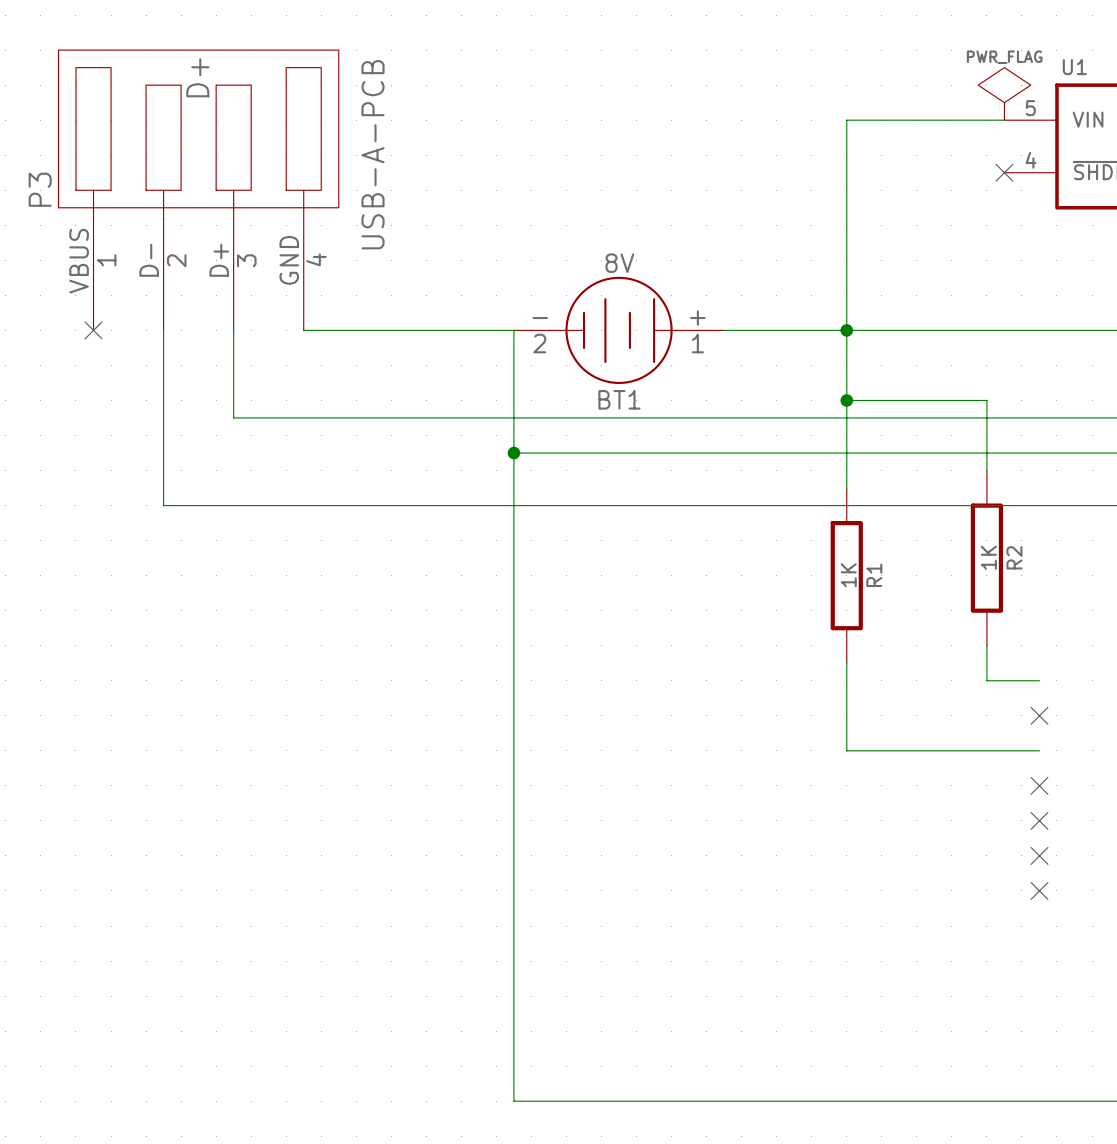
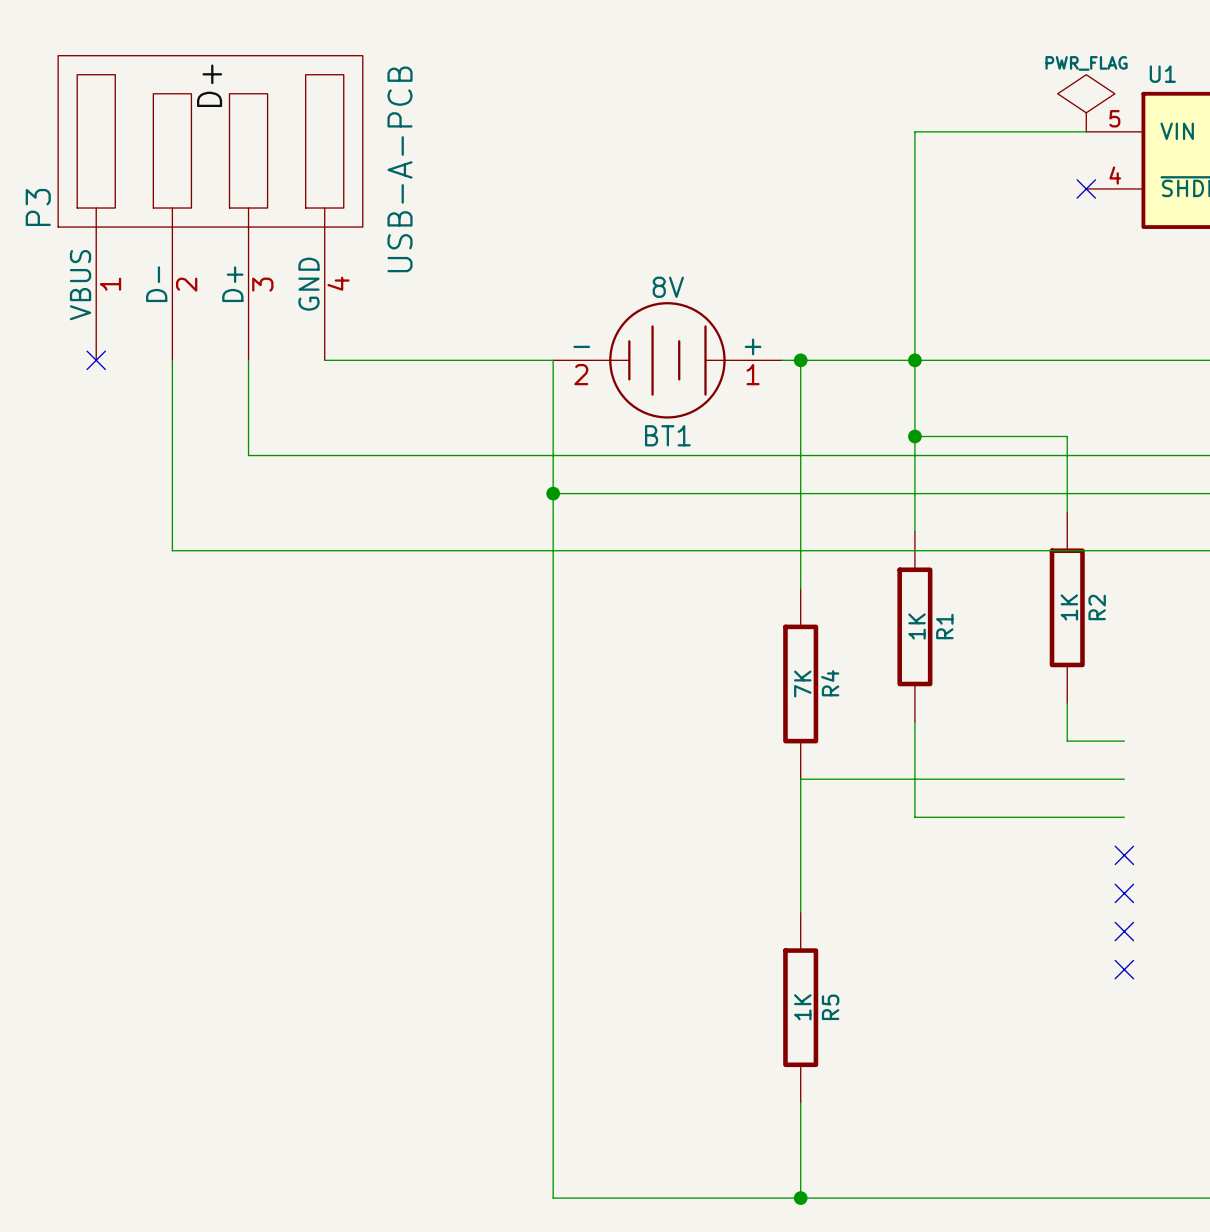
wire: none -> (800, 360) (800, 588)
junction: none -> (800, 360)
R4: none -> 7K (800, 684)
wire: none -> (1124, 779) (800, 779) (800, 912)
no-connect mark: (1039, 715) -> none
R5: none -> 1K (800, 1007)
wire: none -> (800, 1102) (800, 1198)
junction: none -> (800, 1198)

